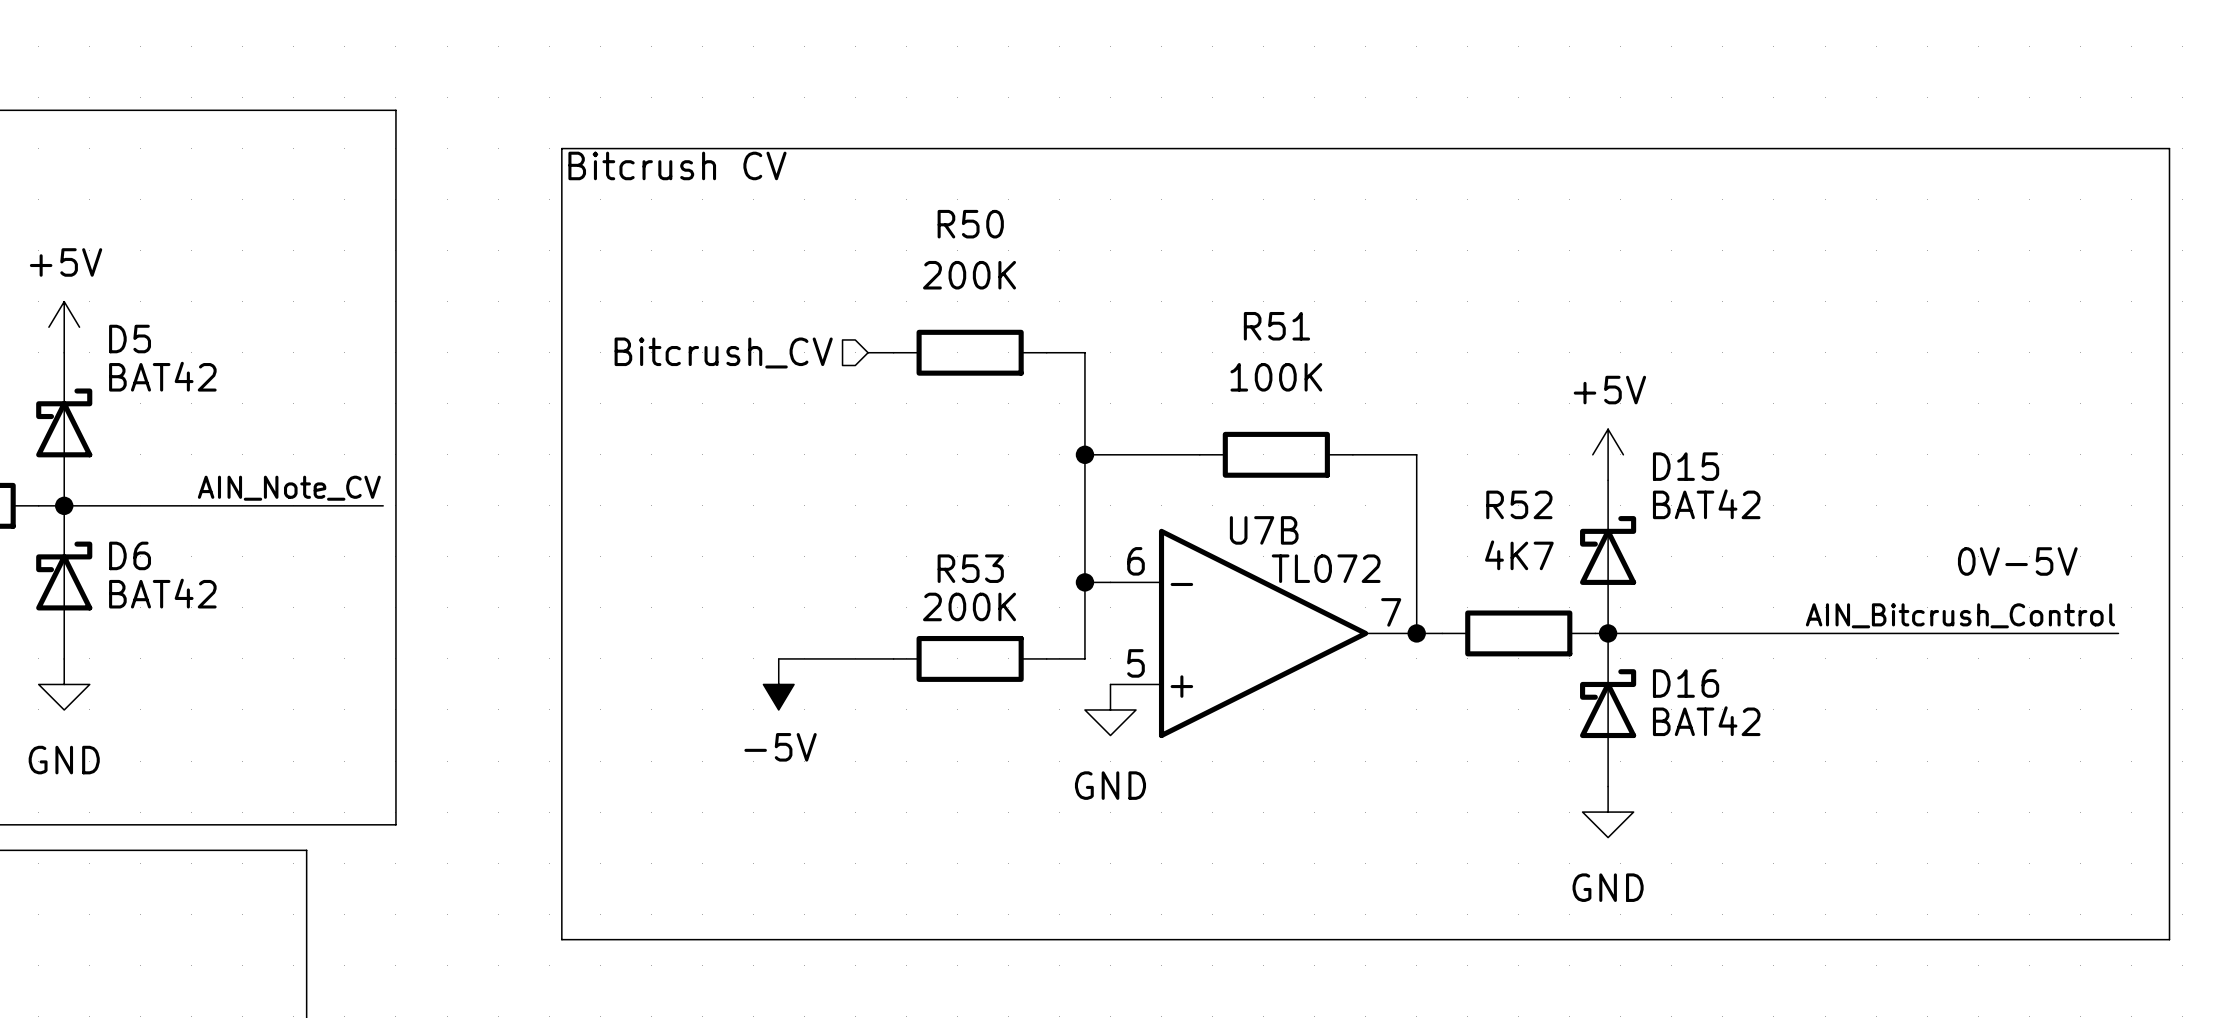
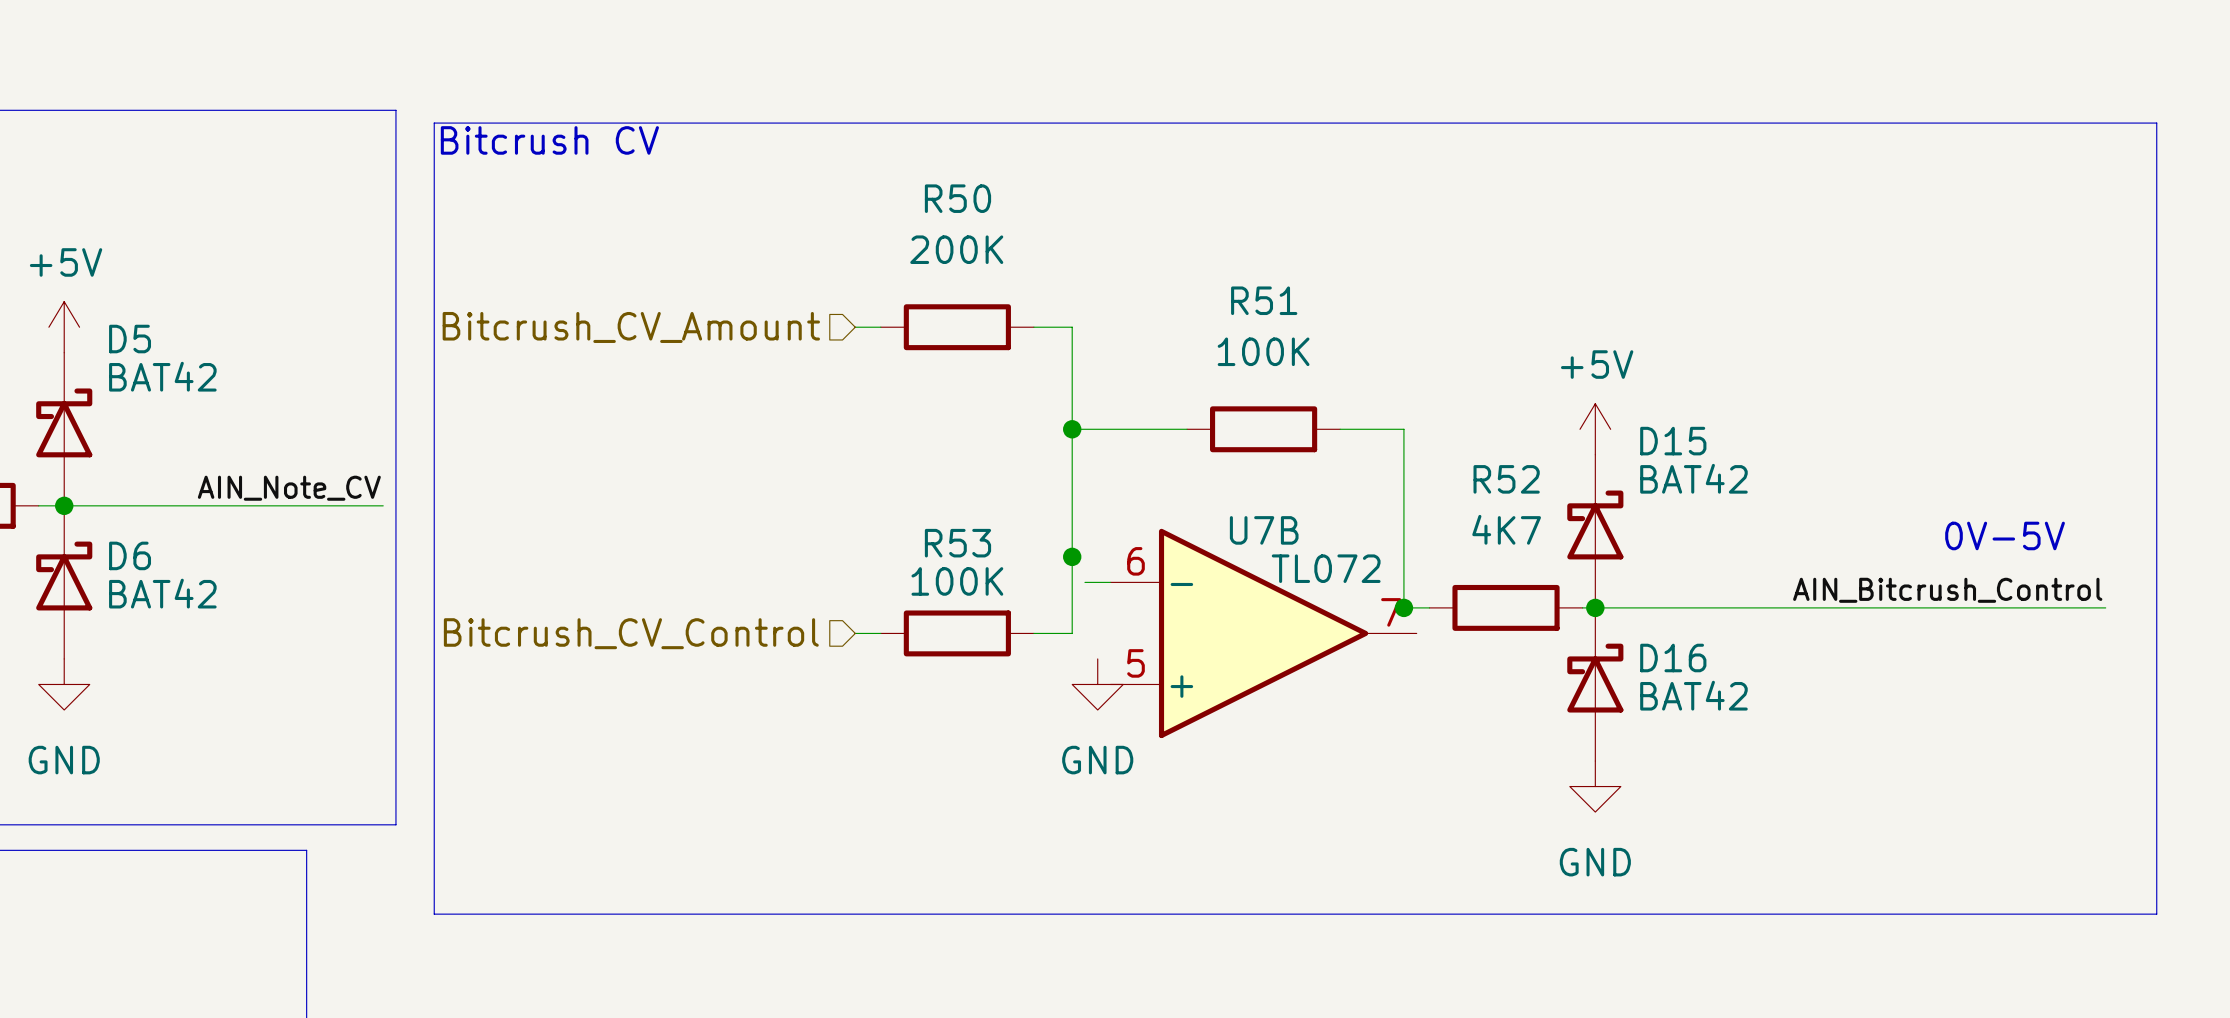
line: (561, 148) (2169, 148) (2169, 939) (561, 939) (561, 148) -> (434, 123) (434, 914) (2156, 914) (2156, 123) (434, 123)
text position: Bitcrush CV (677, 165) -> Bitcrush CV (549, 140)
hierarchical label: Bitcrush_CV (723, 352) -> Bitcrush_CV_Amount (631, 327)
wire: (868, 352) (893, 352) -> (855, 327) (880, 327)
R50 position: (970, 352) -> (957, 327)
wire: (1046, 352) (1084, 352) (1084, 658) (1046, 658) -> (1033, 327) (1072, 327) (1072, 633) (1033, 633)
wire: (1084, 454) (1199, 454) -> (1072, 429) (1187, 429)
junction position: (1084, 454) -> (1072, 429)
R51 position: (1276, 454) -> (1263, 429)
wire: (1352, 454) (1416, 454) (1416, 633) (1442, 633) -> (1340, 429) (1403, 429) (1403, 607) (1429, 607)
power symbol position: +5V (1608, 454) -> +5V (1595, 429)
D15 position: (1608, 556) -> (1595, 531)
text position: 0V-5V (2017, 561) -> 0V-5V (2005, 535)
junction position: (1084, 582) -> (1072, 556)
R53 value: 200K (969, 606) -> 100K (957, 581)
label position: AIN_Bitcrush_Control (1960, 615) -> AIN_Bitcrush_Control (1947, 590)
hierarchical label: none -> Bitcrush_CV_Control (631, 633)
wire: none -> (855, 633) (880, 633)
junction position: (1416, 633) -> (1403, 607)
R52 position: (1518, 633) -> (1506, 607)
wire: (1595, 633) (2118, 633) -> (1582, 607) (2105, 607)
junction position: (1608, 633) -> (1595, 607)
wire: (778, 658) (893, 658) -> none
R53 position: (970, 658) -> (957, 633)
power symbol: -5V (778, 684) -> none
power symbol position: GND (1110, 709) -> GND (1097, 684)
D16 position: (1608, 709) -> (1595, 684)
power symbol position: GND (1608, 812) -> GND (1595, 786)

